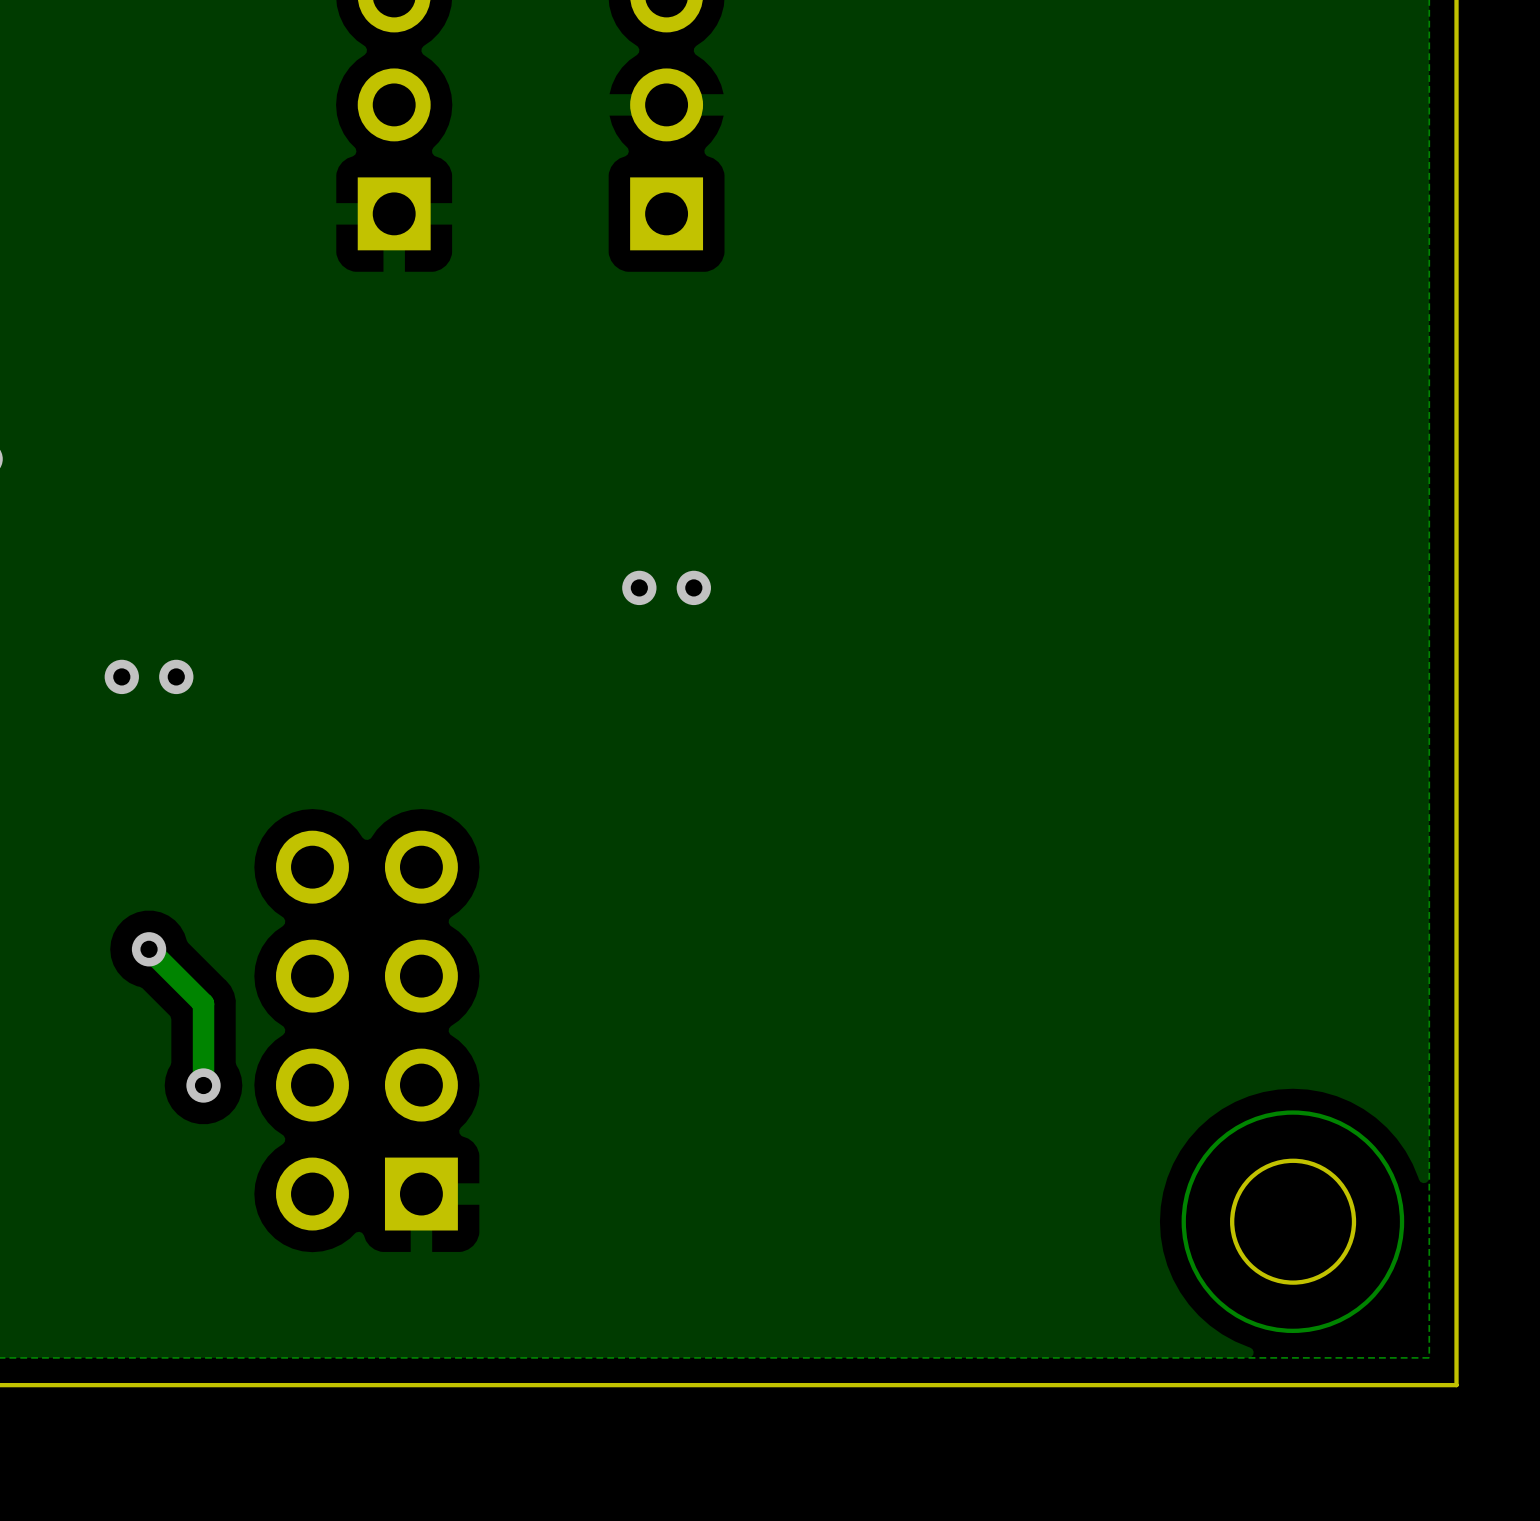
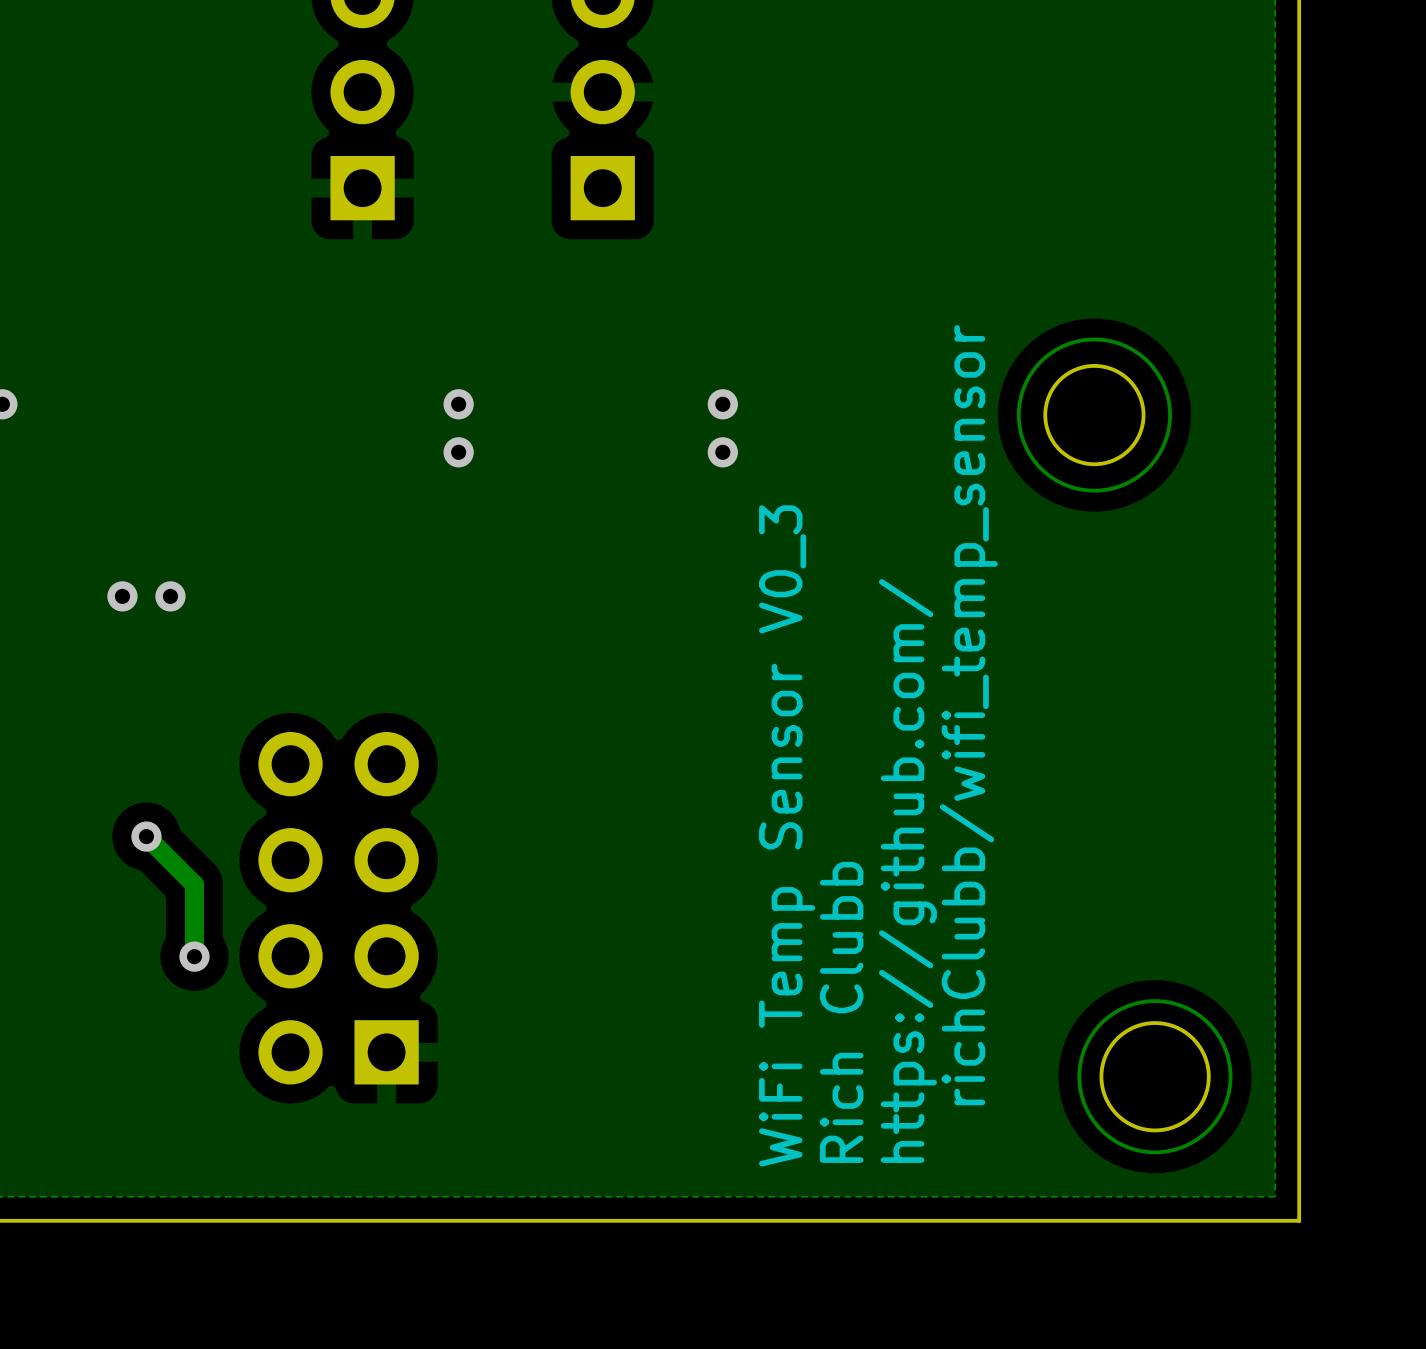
drawing: none -> [1016, 337, 1172, 493]
round board edge: none -> [1043, 364, 1146, 467]
via: none -> (458, 404)
via: none -> (722, 404)
via: none -> (458, 452)
via: none -> (722, 452)
via: (639, 587) -> none
via: (693, 587) -> none
text: none -> richClubb/wifi_temp_sensor (968, 715)
text: none -> WiFi Temp Sensor V0_3 (787, 835)
text: none -> https://github.com/ (907, 871)
drawing shape: [1181, 1110, 1405, 1333] -> [1077, 999, 1233, 1155]
text: none -> Rich Clubb (841, 1012)

